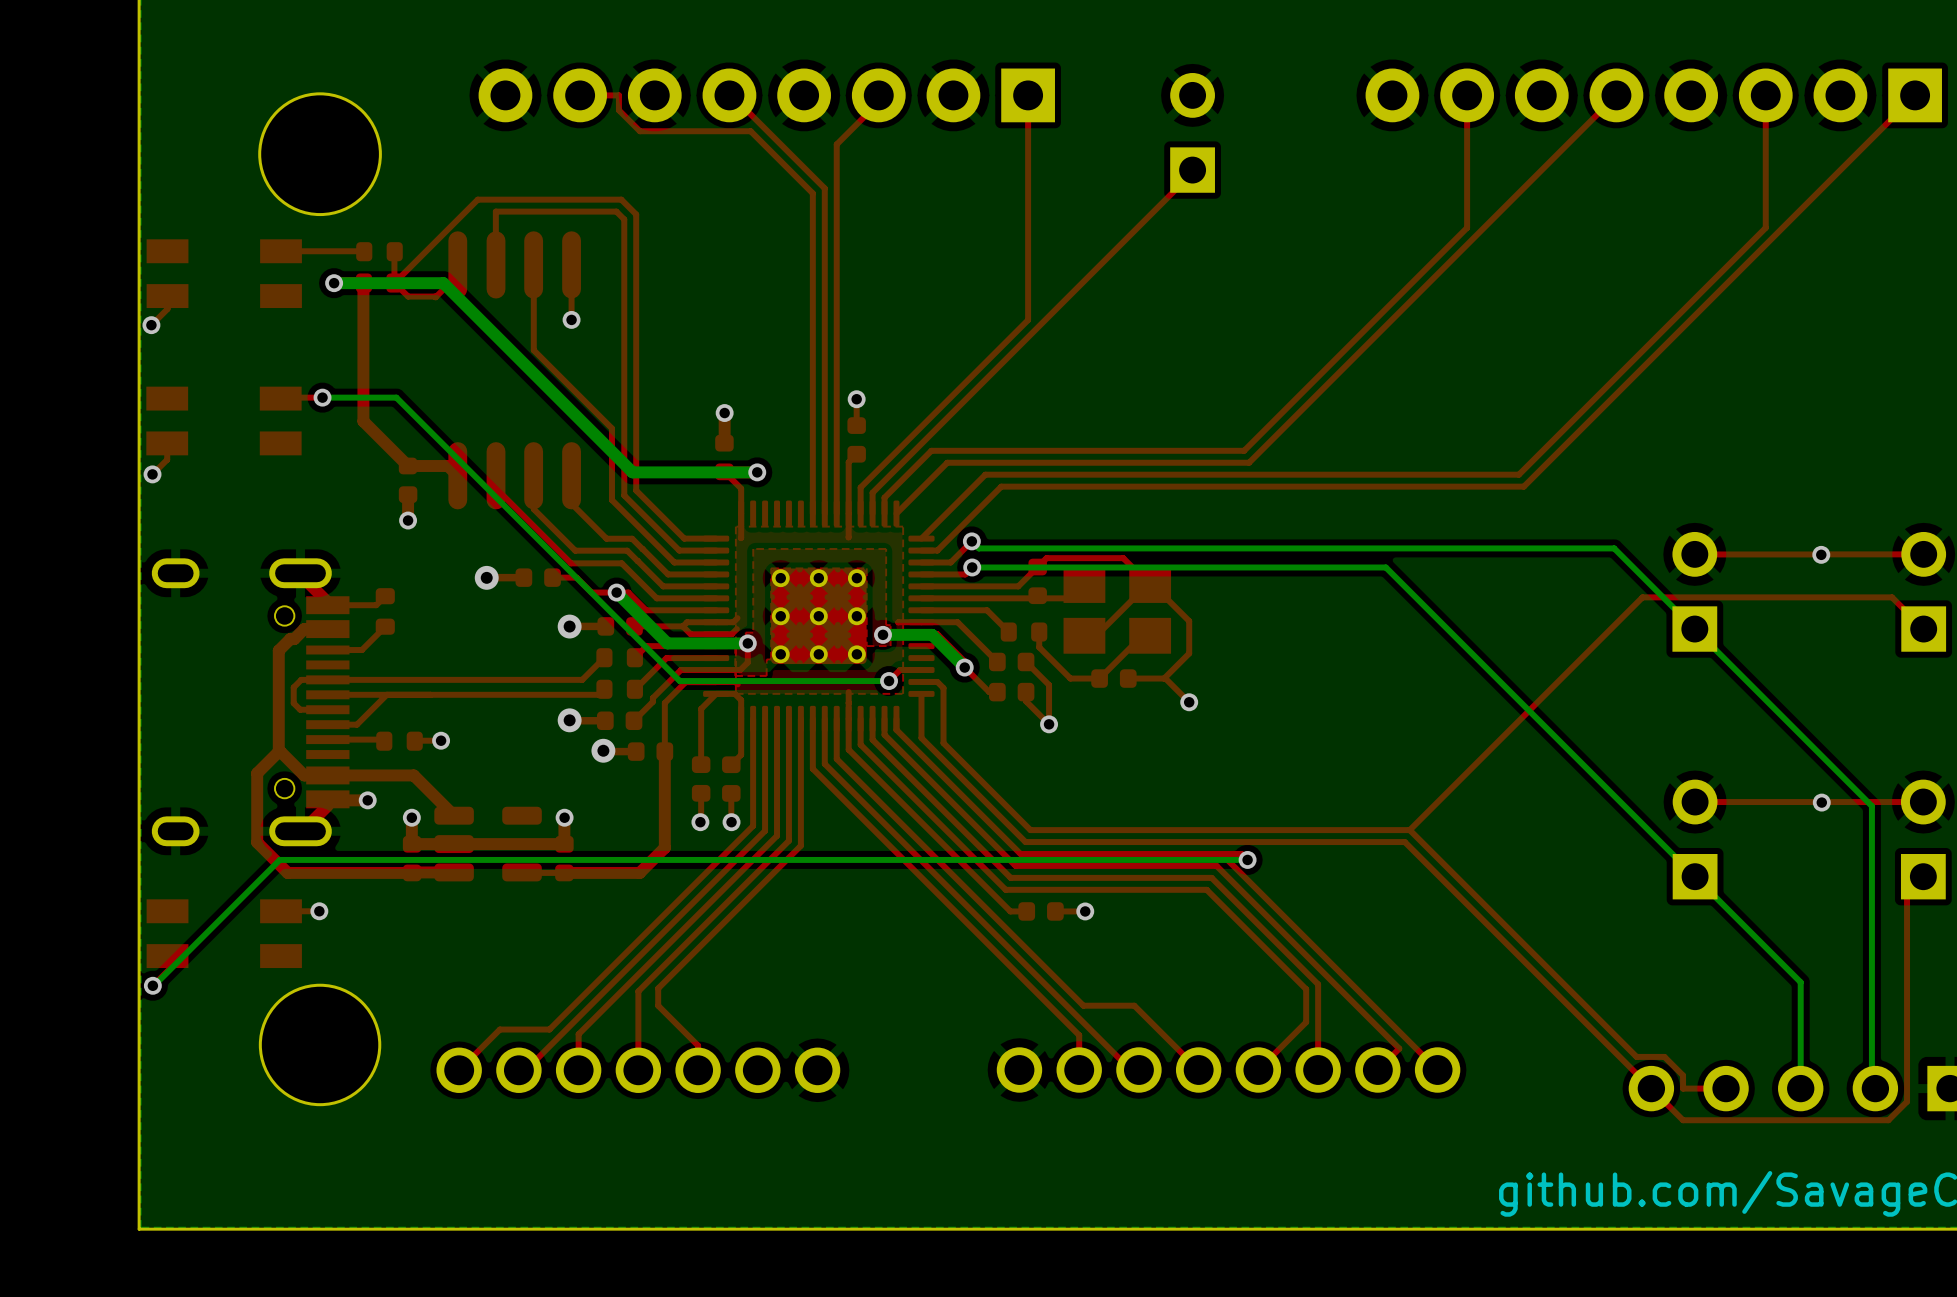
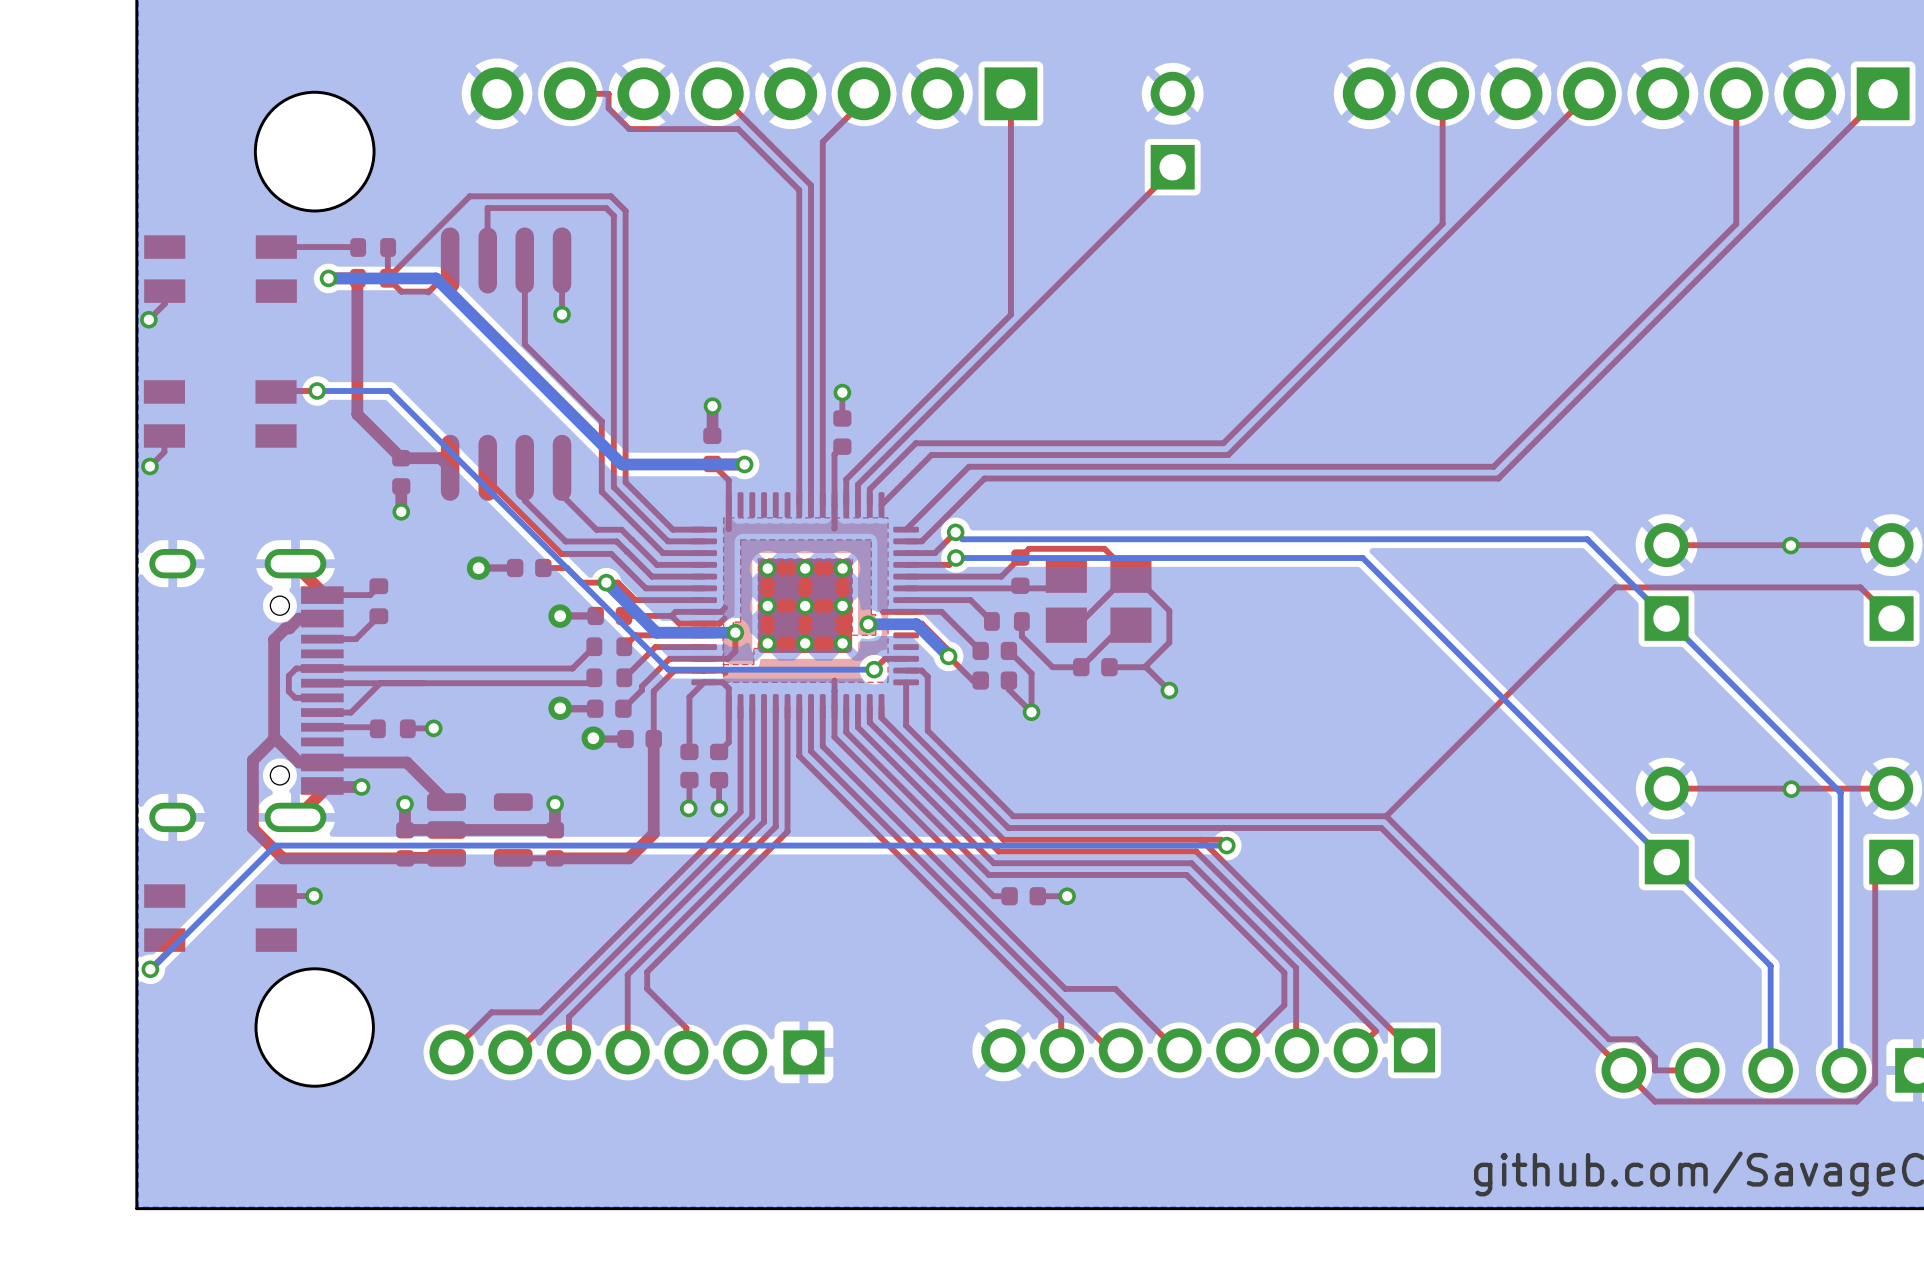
part footprint: [436, 1047, 841, 1093] -> [429, 1030, 825, 1075]
part footprint: [996, 1047, 1461, 1093] -> [981, 1028, 1436, 1073]

